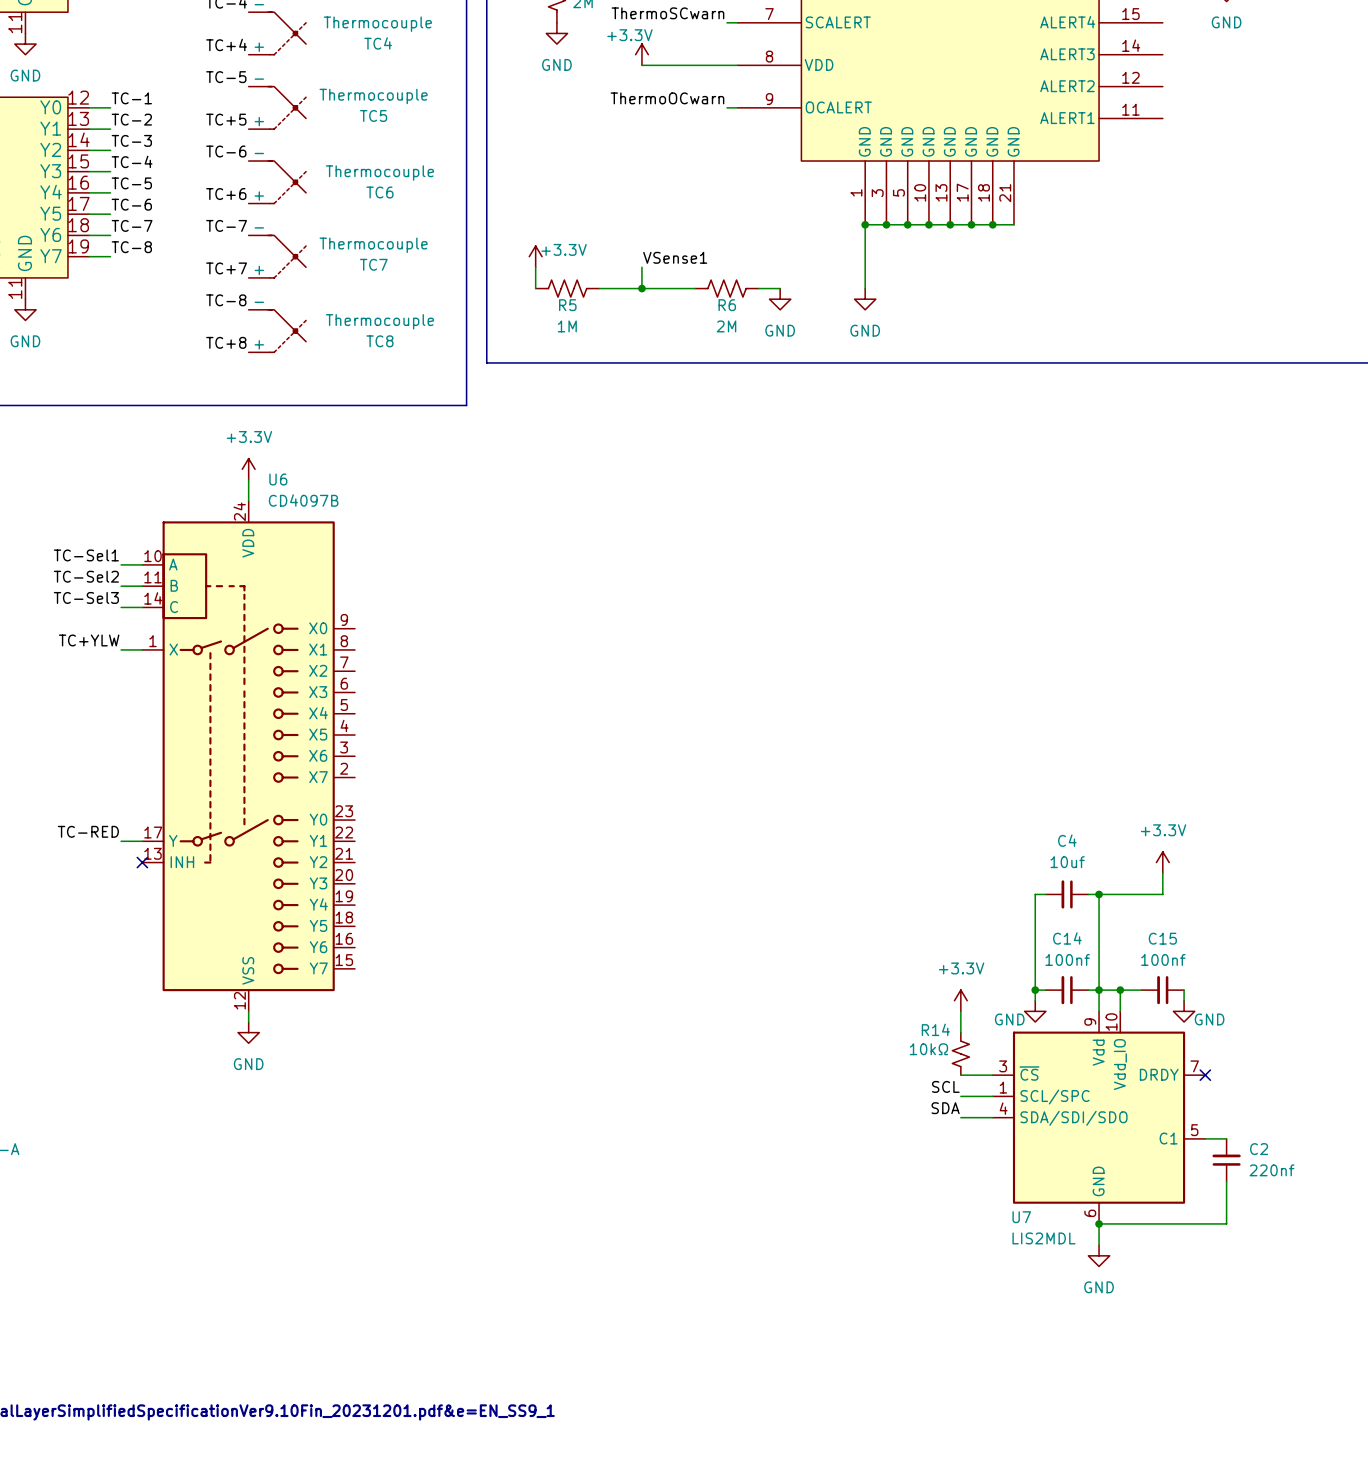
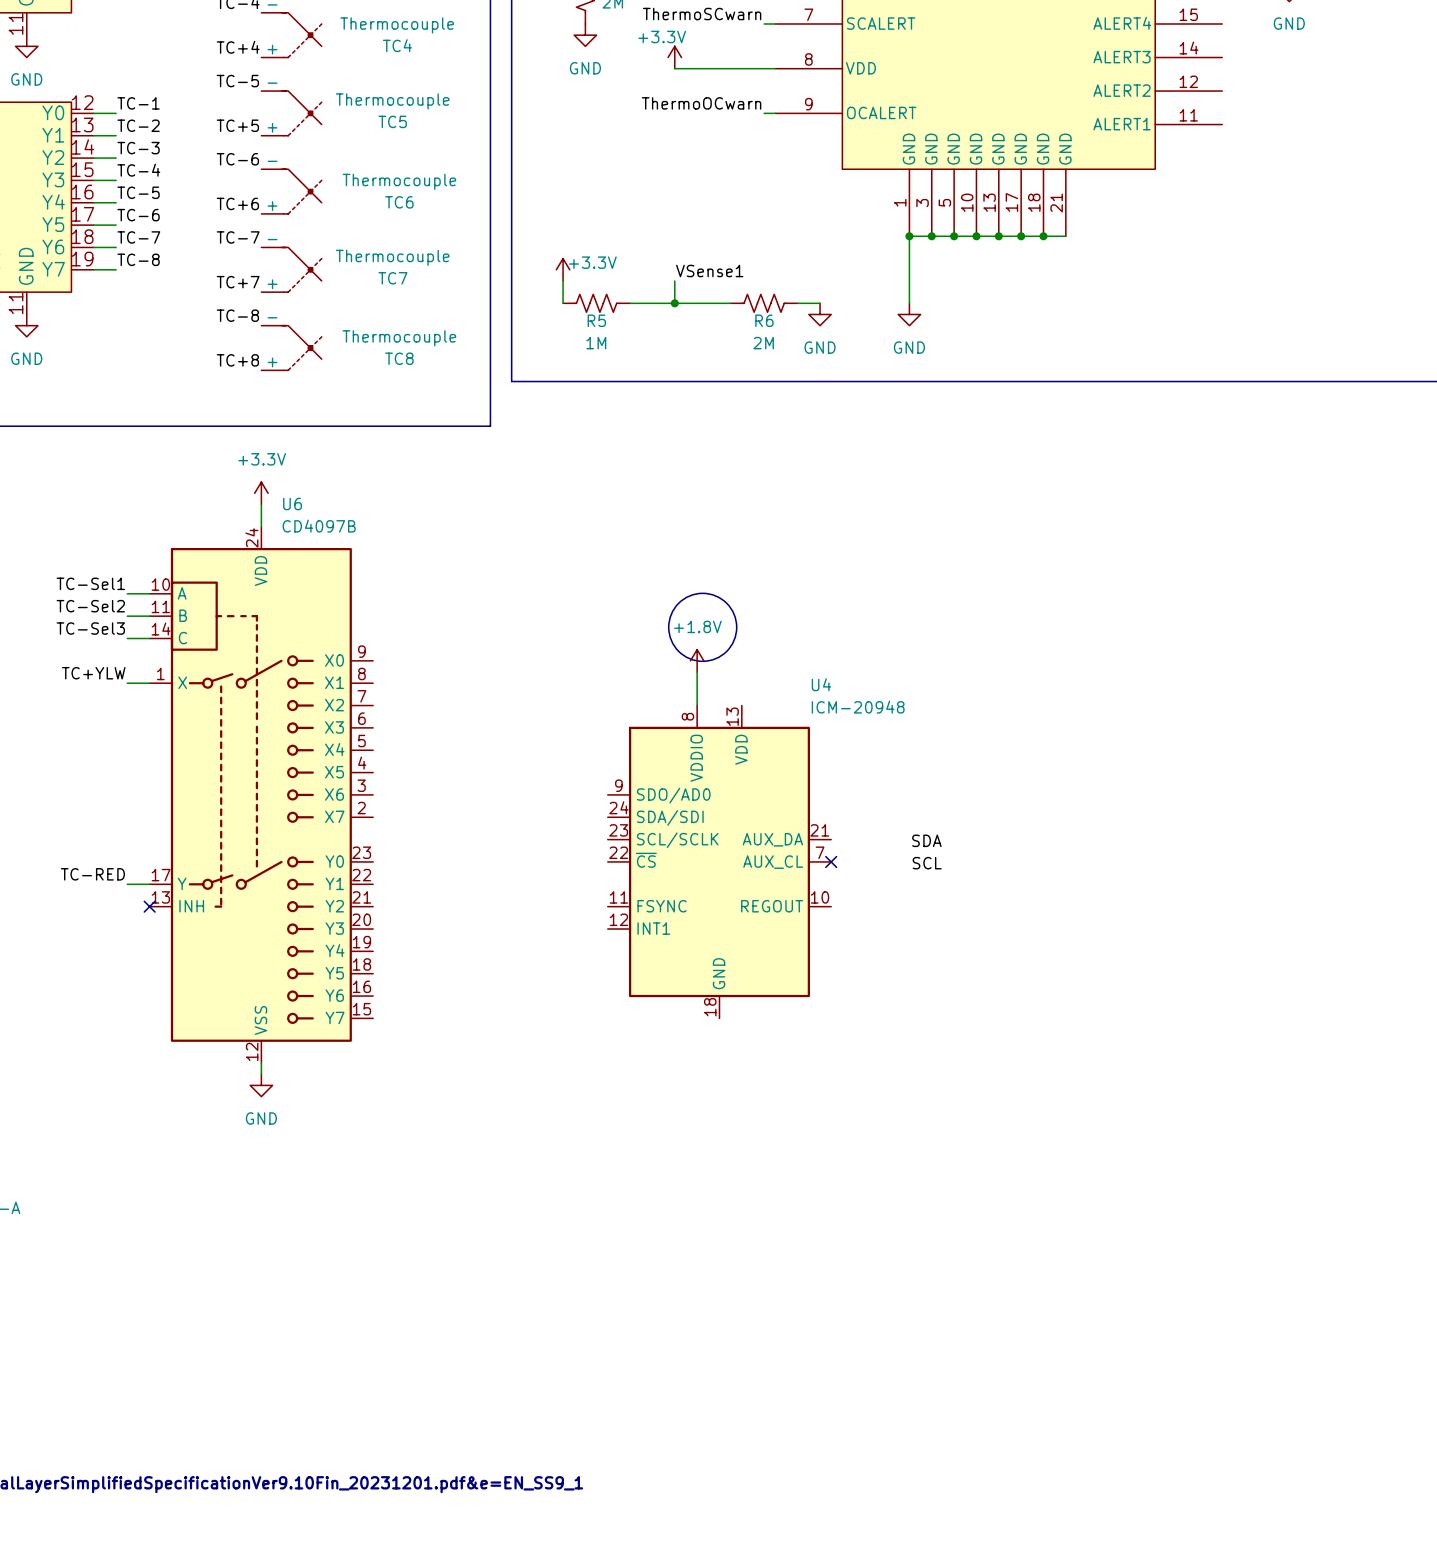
drawing: none -> [668, 593, 737, 662]
power symbol: none -> +1.8V (697, 660)
wire: none -> (697, 672) (697, 705)
label: none -> SDA (926, 840)
U4: none -> ICM-20948 (719, 861)
no-connect mark: none -> (831, 861)
label: none -> SCL (927, 863)
power symbol: +3.3V (1162, 862) -> none
wire: (1162, 873) (1162, 894) (1088, 894) -> none
wire: (1045, 894) (1035, 894) (1035, 1000) -> none
C4: 10uf (1067, 894) -> none
wire: (1099, 894) (1099, 1011) -> none
junction: (1099, 894) -> none
wire: (1035, 990) (1045, 990) -> none
junction: (1035, 990) -> none
C14: 100nf (1067, 990) -> none
wire: (1088, 990) (1141, 990) -> none
junction: (1099, 990) -> none
wire: (1120, 990) (1120, 1011) -> none
junction: (1120, 990) -> none
C15: 100nf (1162, 990) -> none
wire: (1184, 990) (1184, 1000) -> none
power symbol: +3.3V (960, 1000) -> none
wire: (960, 1011) (960, 1032) -> none
power symbol: GND (1035, 1011) -> none
power symbol: GND (1184, 1011) -> none
R14: 10kΩ (960, 1053) -> none
wire: (960, 1075) (992, 1075) -> none
no-connect mark: (1205, 1075) -> none
label: SCL (945, 1086) -> none
wire: (960, 1096) (992, 1096) -> none
label: SDA (945, 1108) -> none
wire: (960, 1117) (992, 1117) -> none
U7: LIS2MDL (1099, 1117) -> none
wire: (1205, 1138) (1226, 1138) -> none
C2: 220nf (1226, 1160) -> none
wire: (1226, 1181) (1226, 1223) (1099, 1223) (1099, 1245) -> none
junction: (1099, 1223) -> none
power symbol: GND (1099, 1255) -> none

